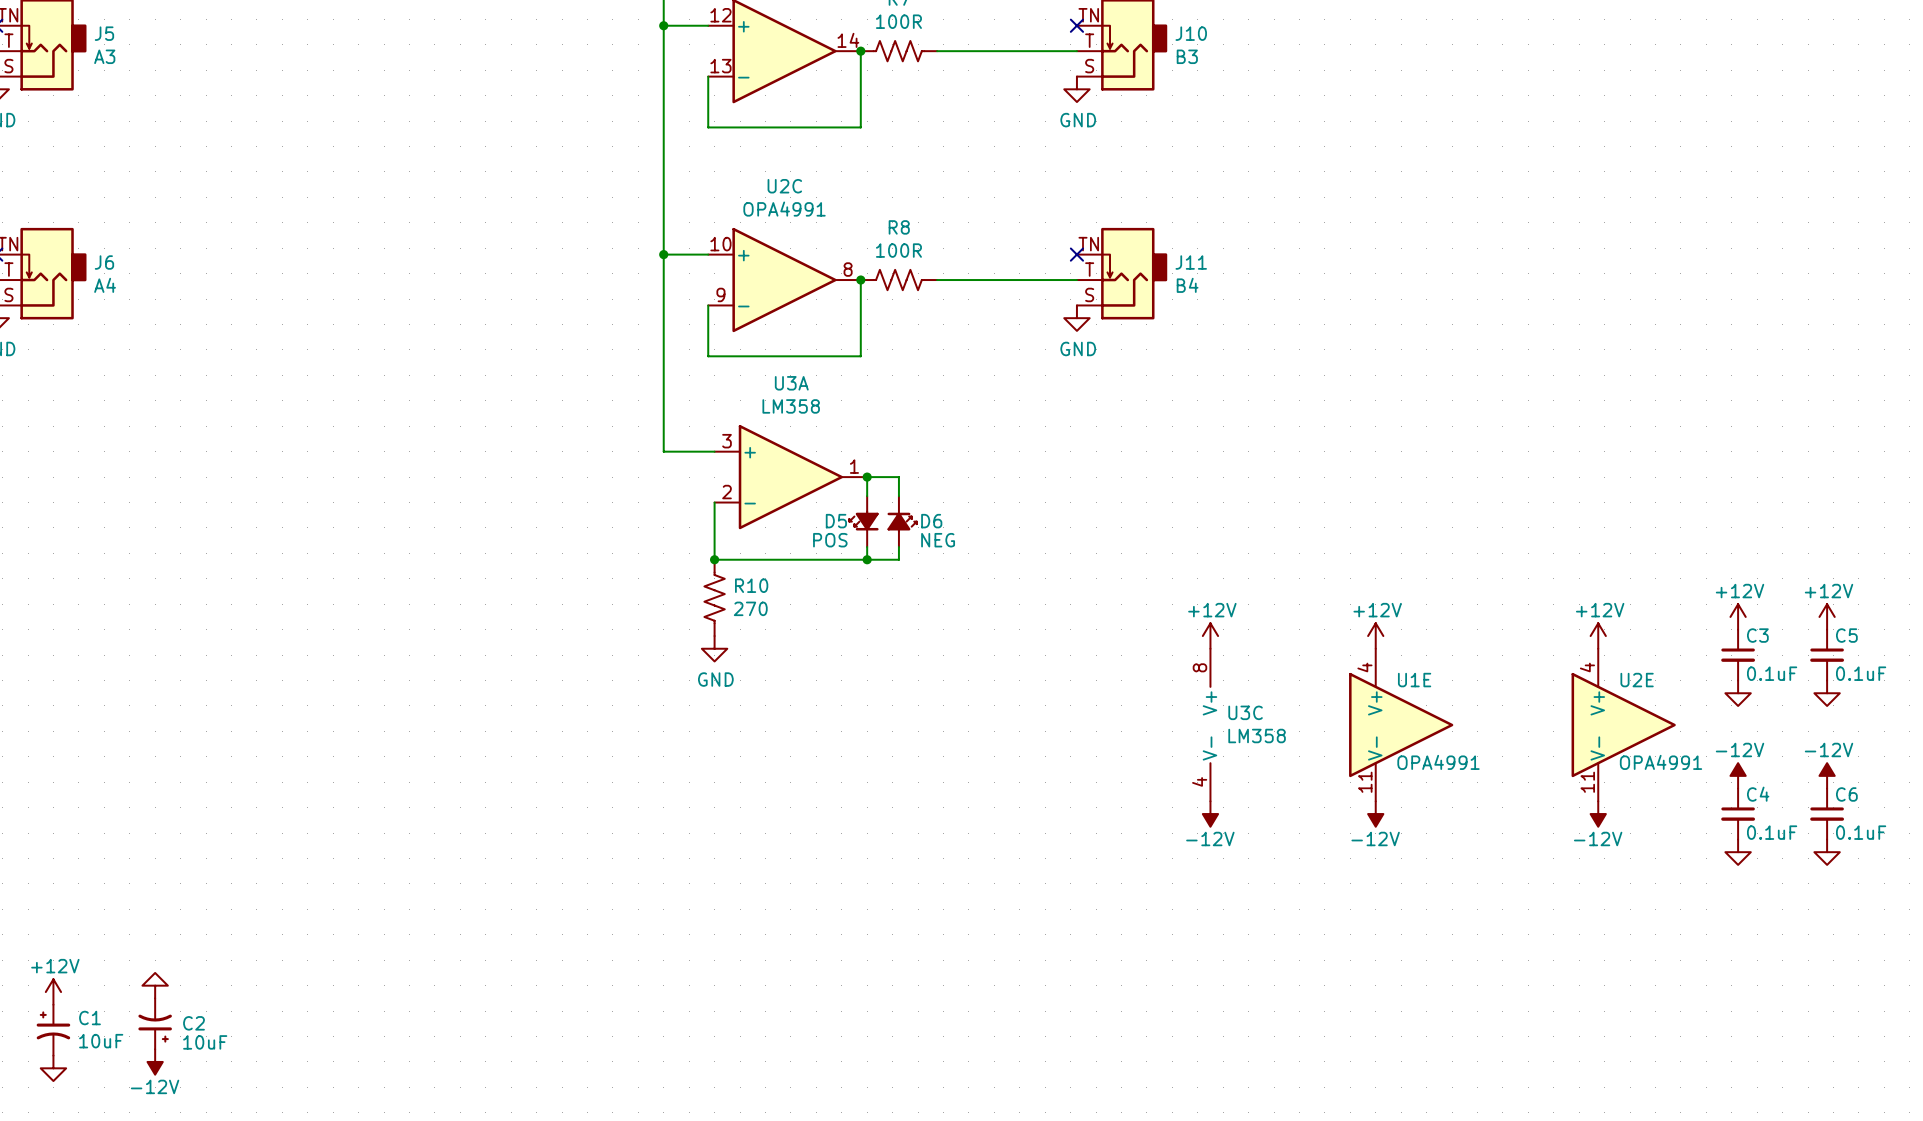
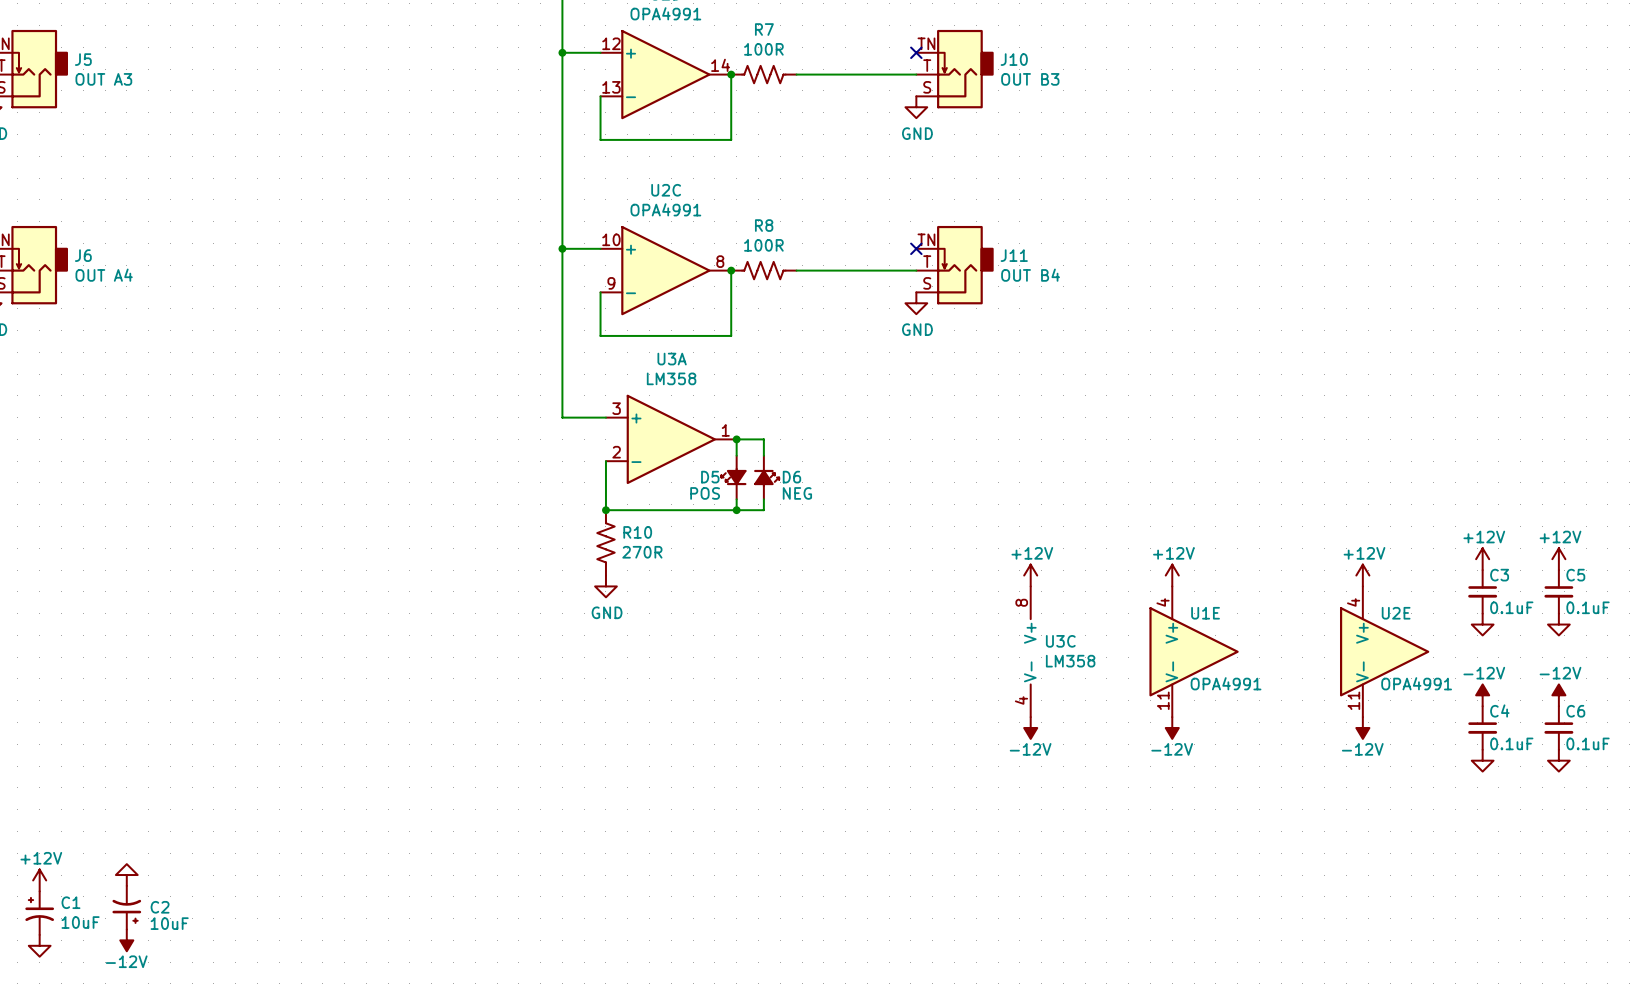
J5 value: A3 (104, 56) -> OUT A3 (103, 79)
J10 value: B3 (1187, 56) -> OUT B3 (1030, 79)
J6 value: A4 (105, 285) -> OUT A4 (104, 275)
J11 value: B4 (1187, 285) -> OUT B4 (1030, 275)
R10 value: 270 (750, 608) -> 270R (642, 552)

